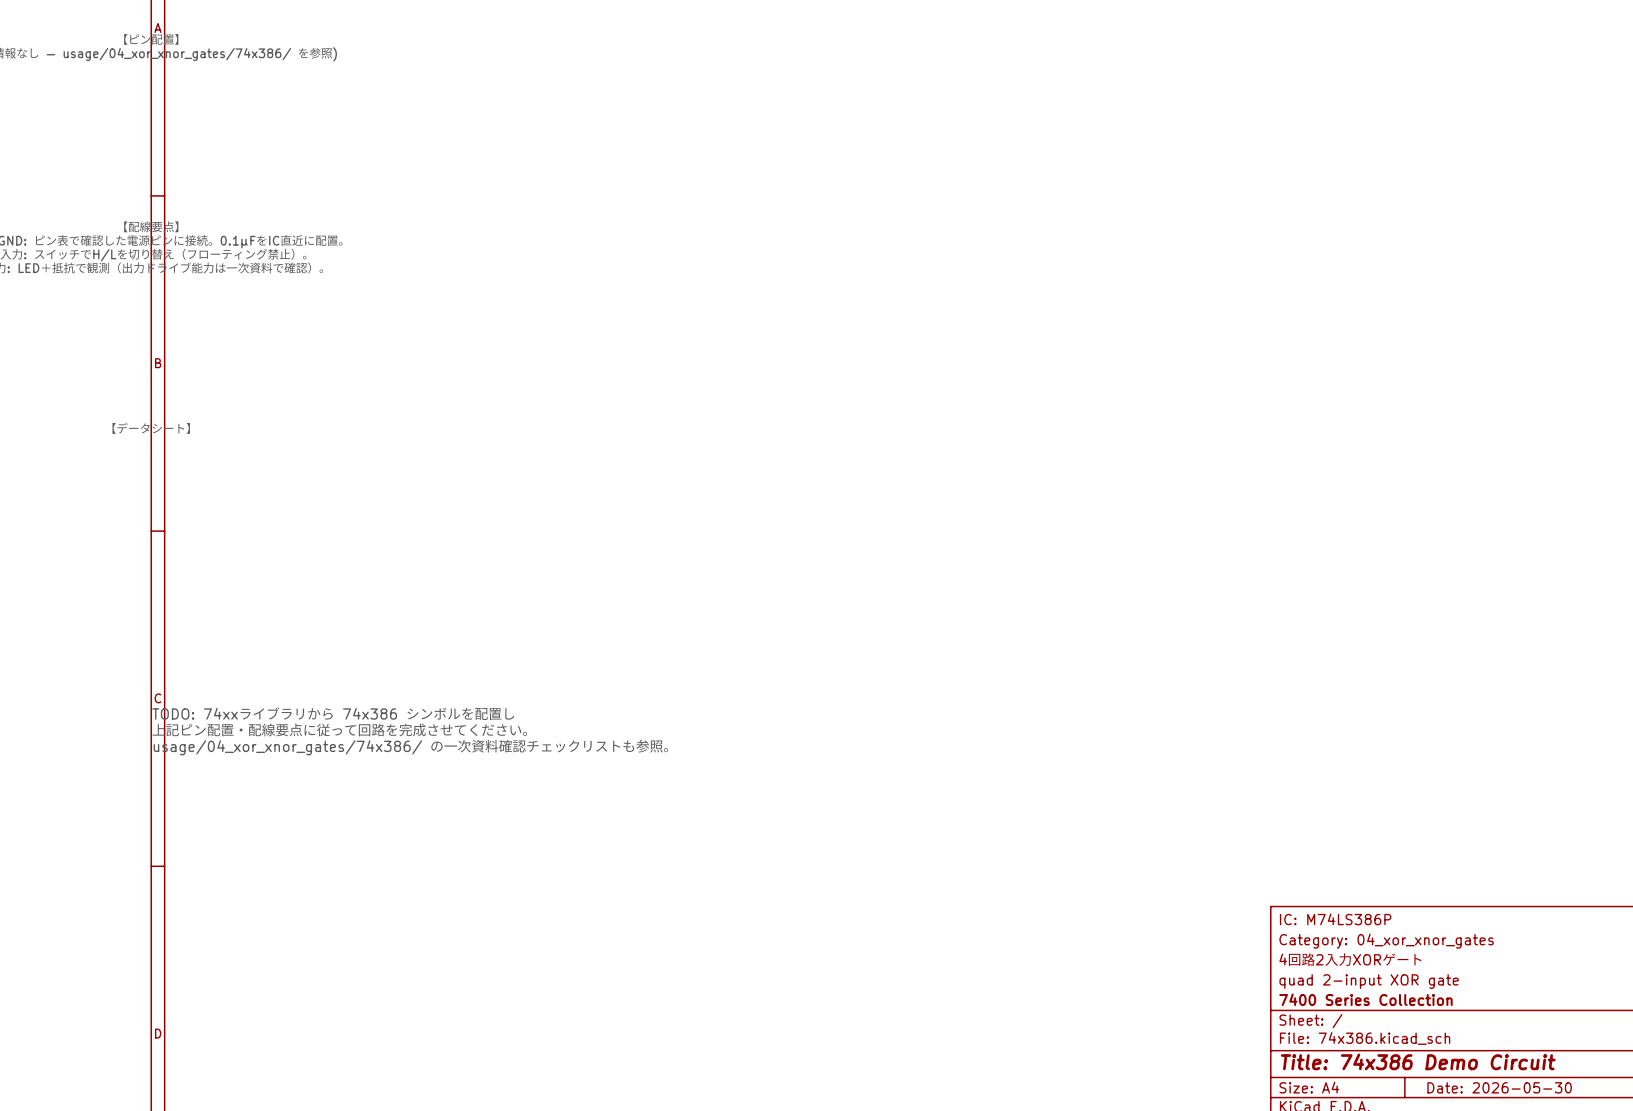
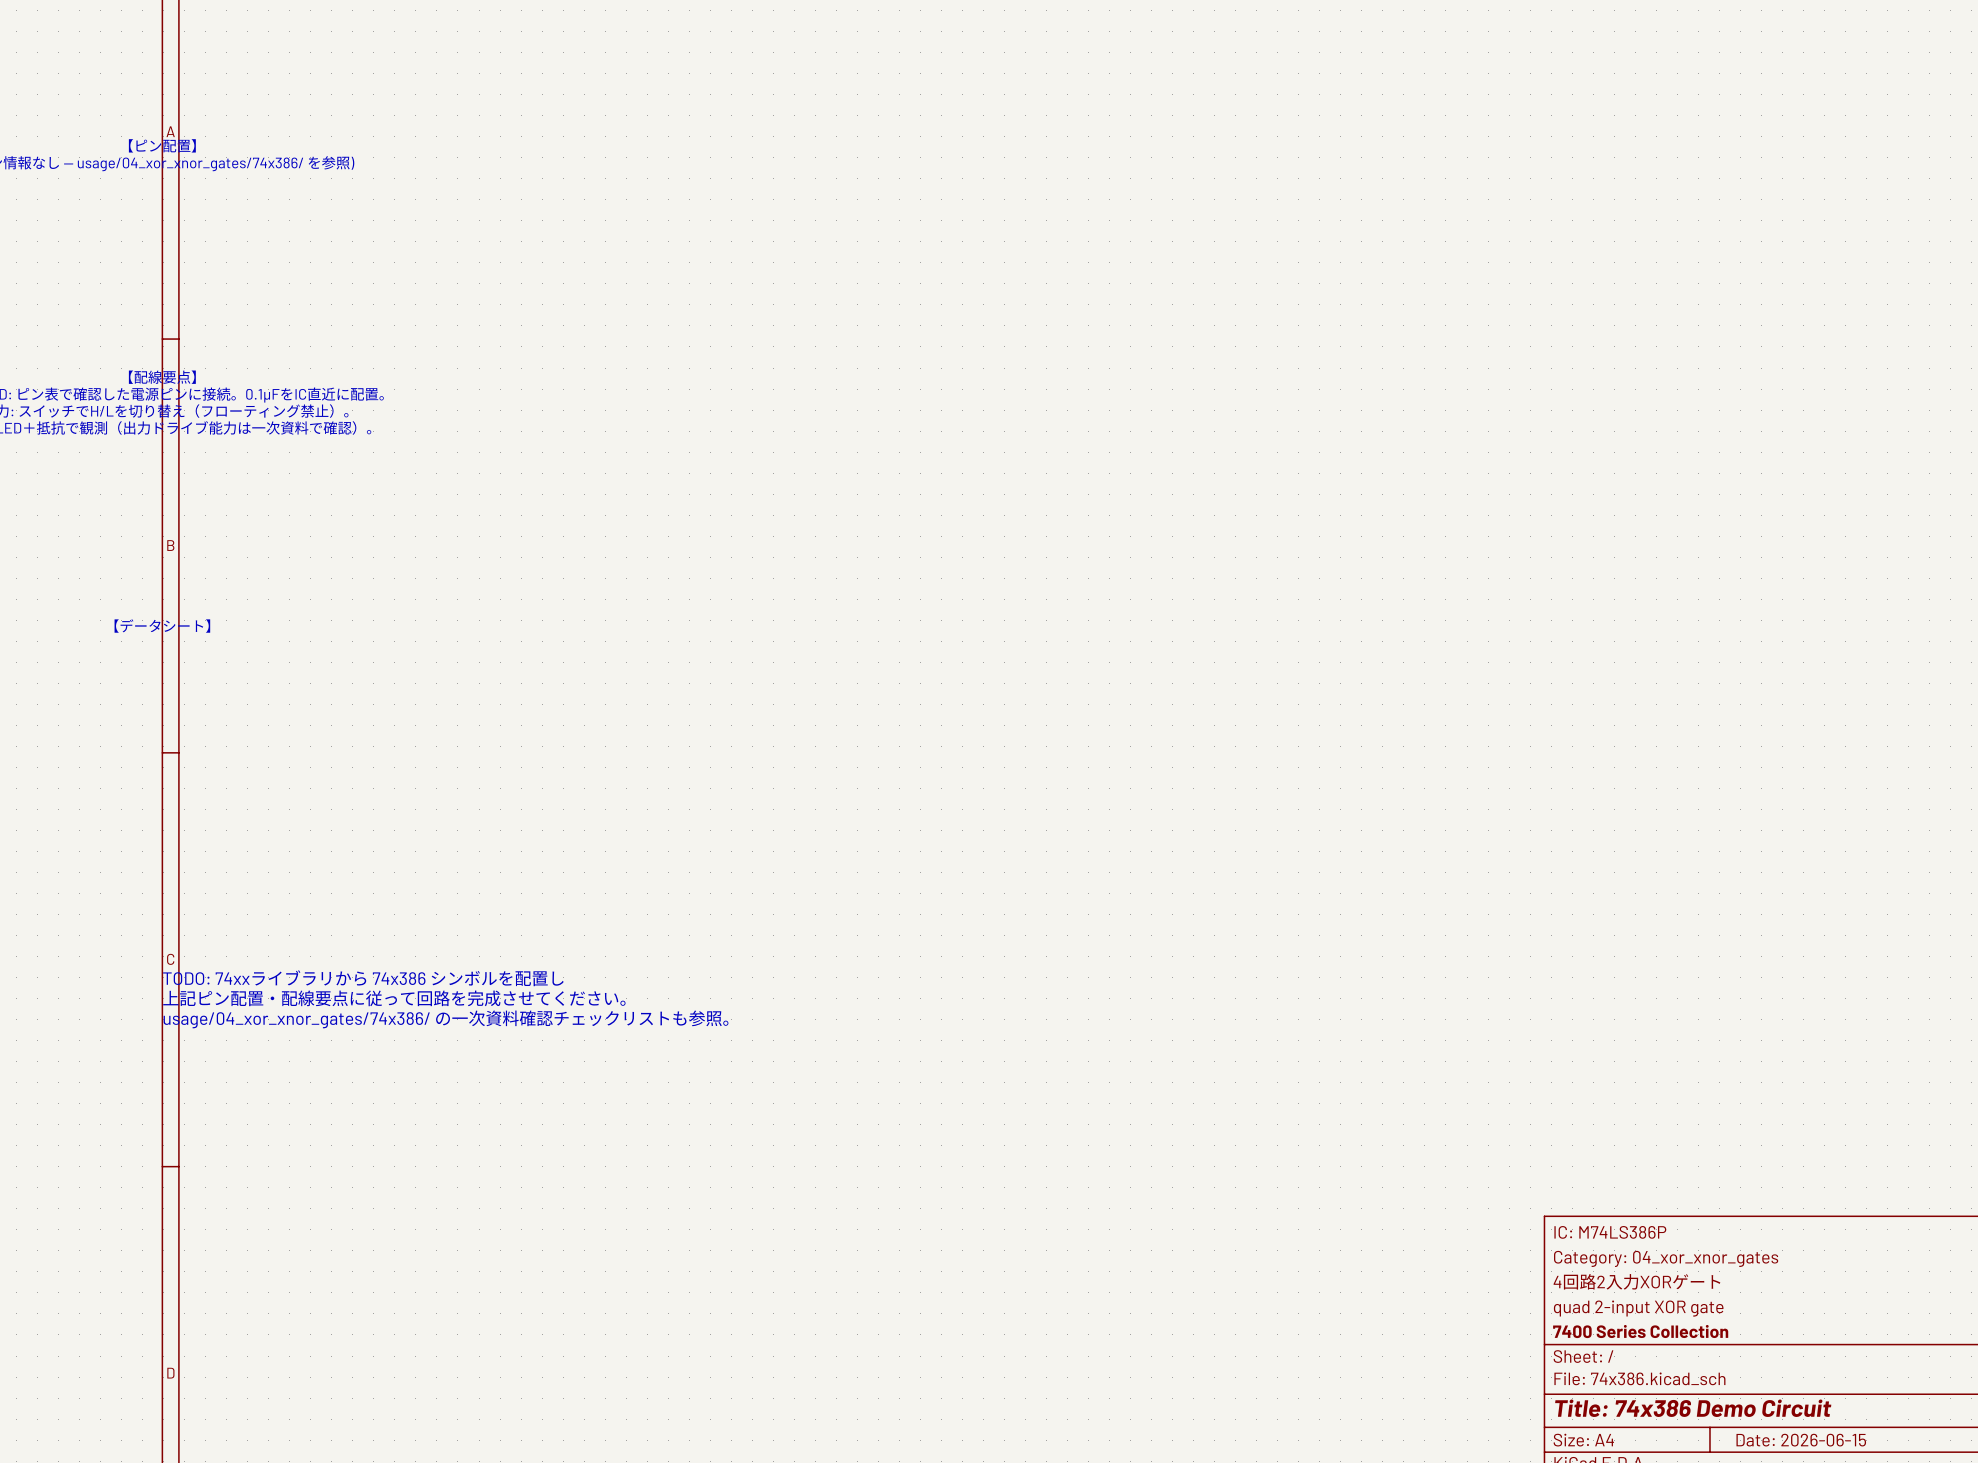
title block: Date: 2026-05-30 (1499, 1087) -> Date: 2026-06-15 (1801, 1440)

